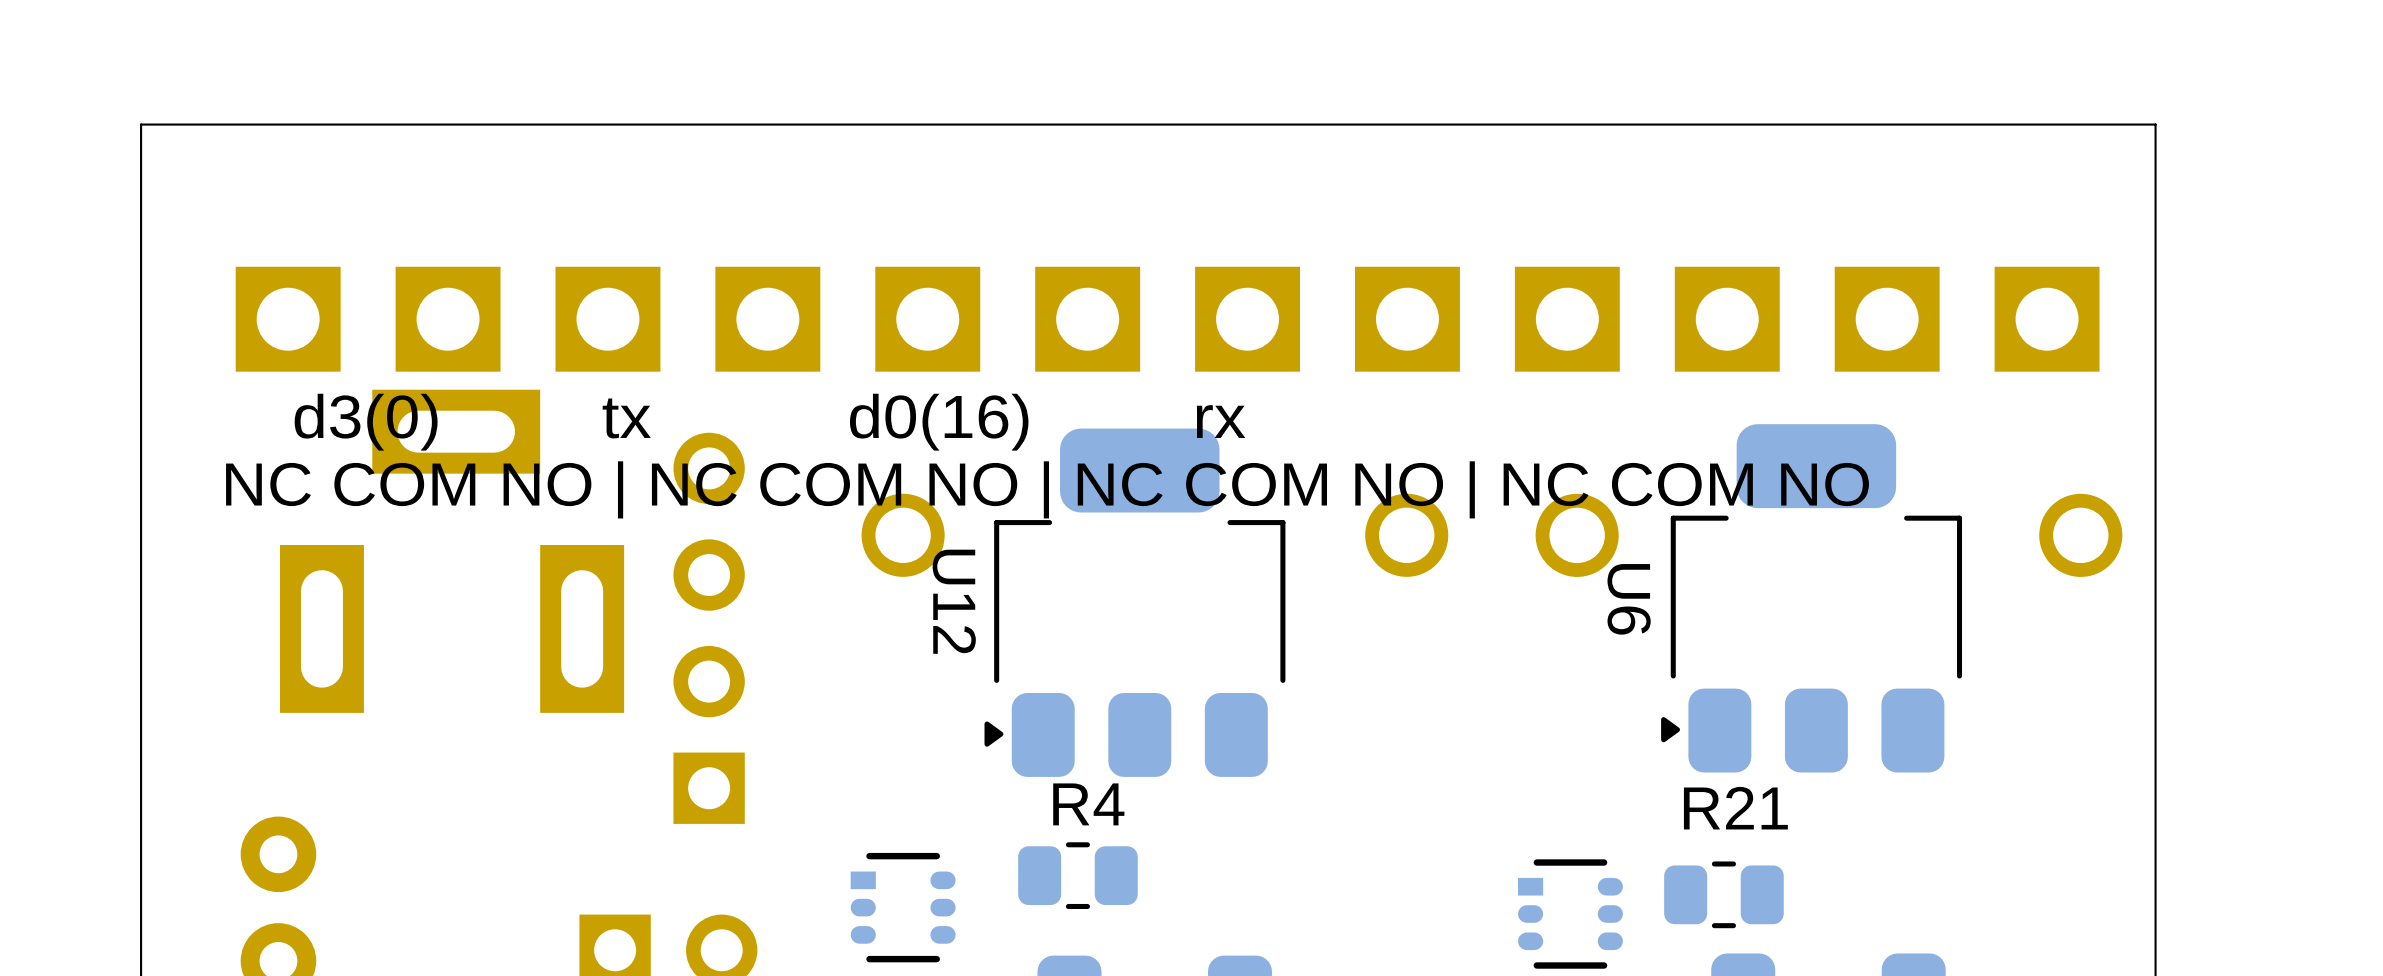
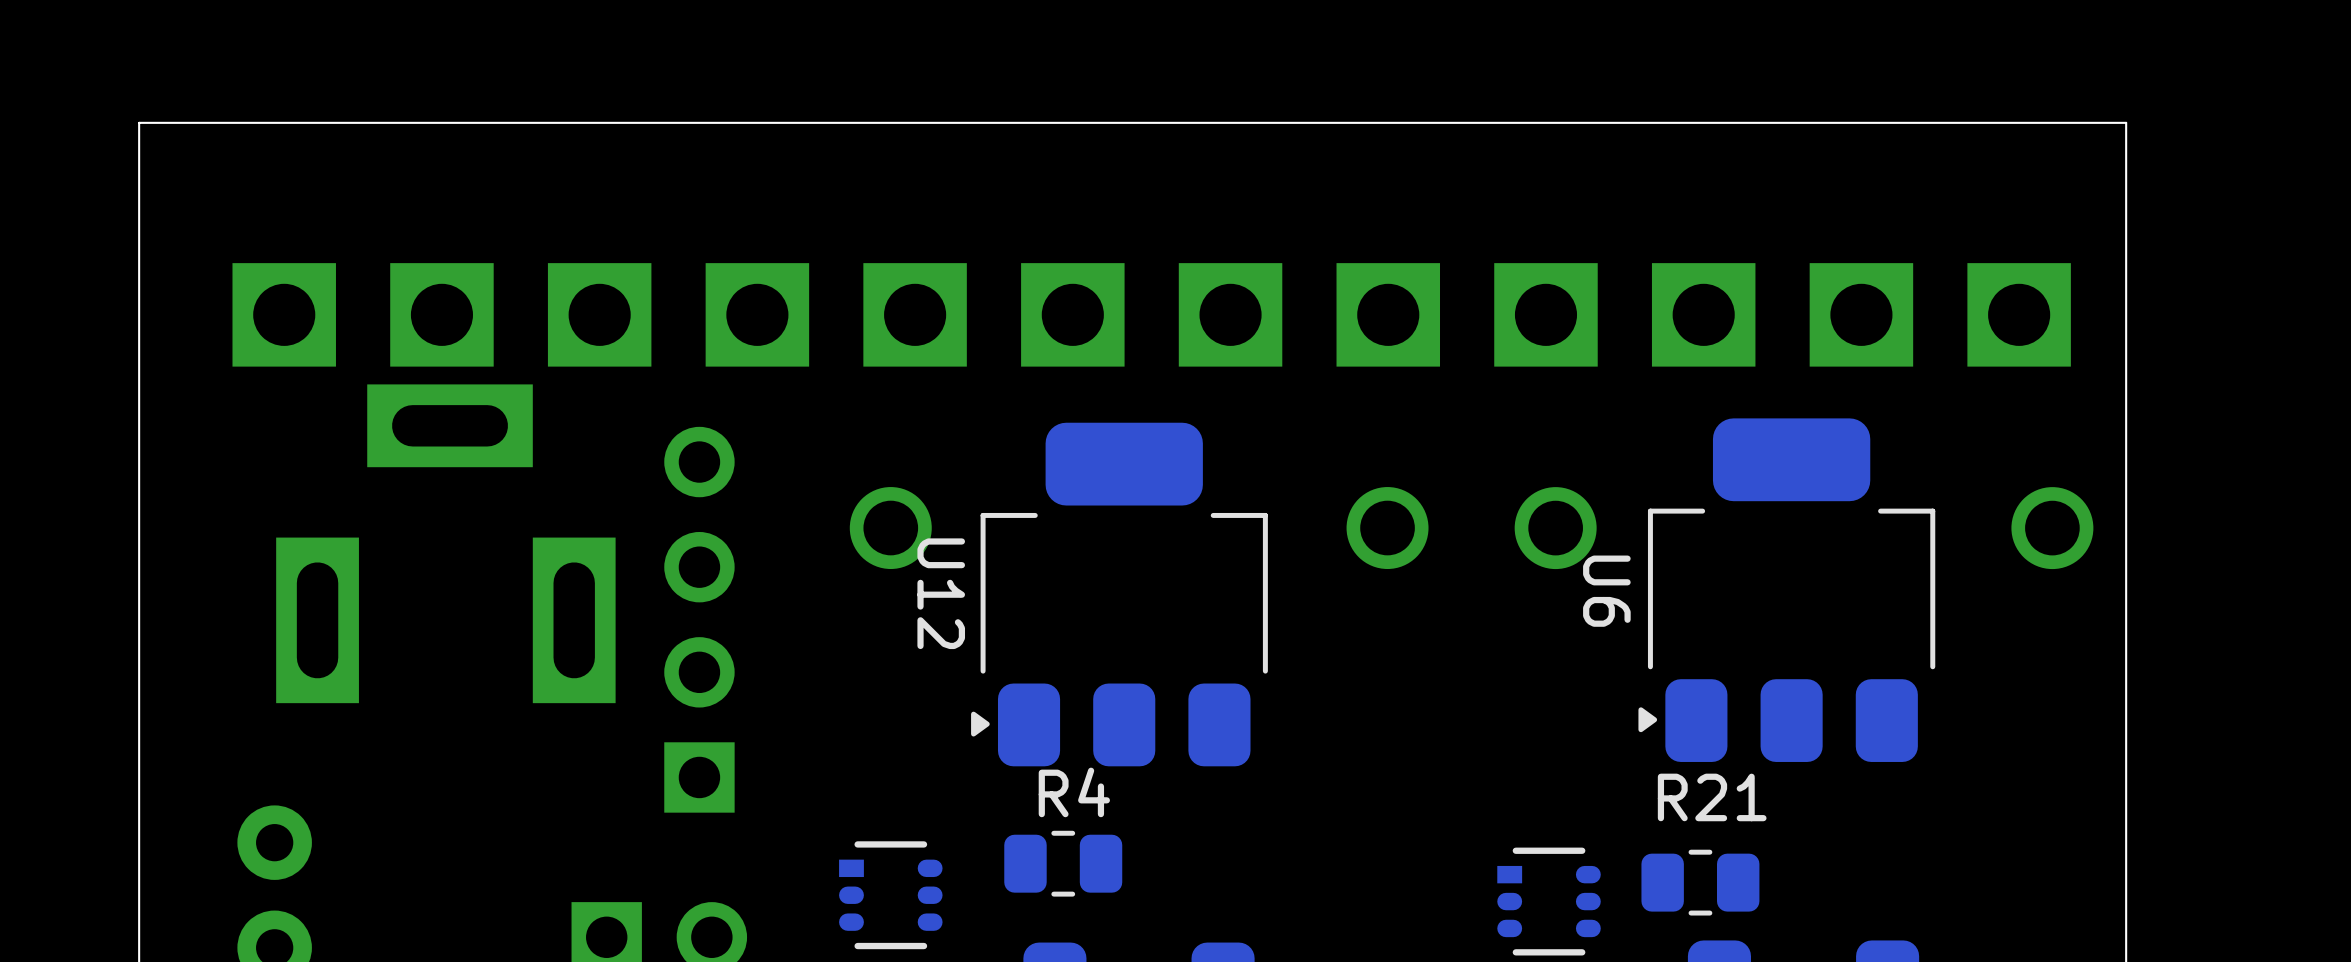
text: d3(0) tx d0(16) rx (769, 422) -> none
text: NC COM NO | NC COM NO | NC COM NO | NC COM NO (1047, 489) -> none

